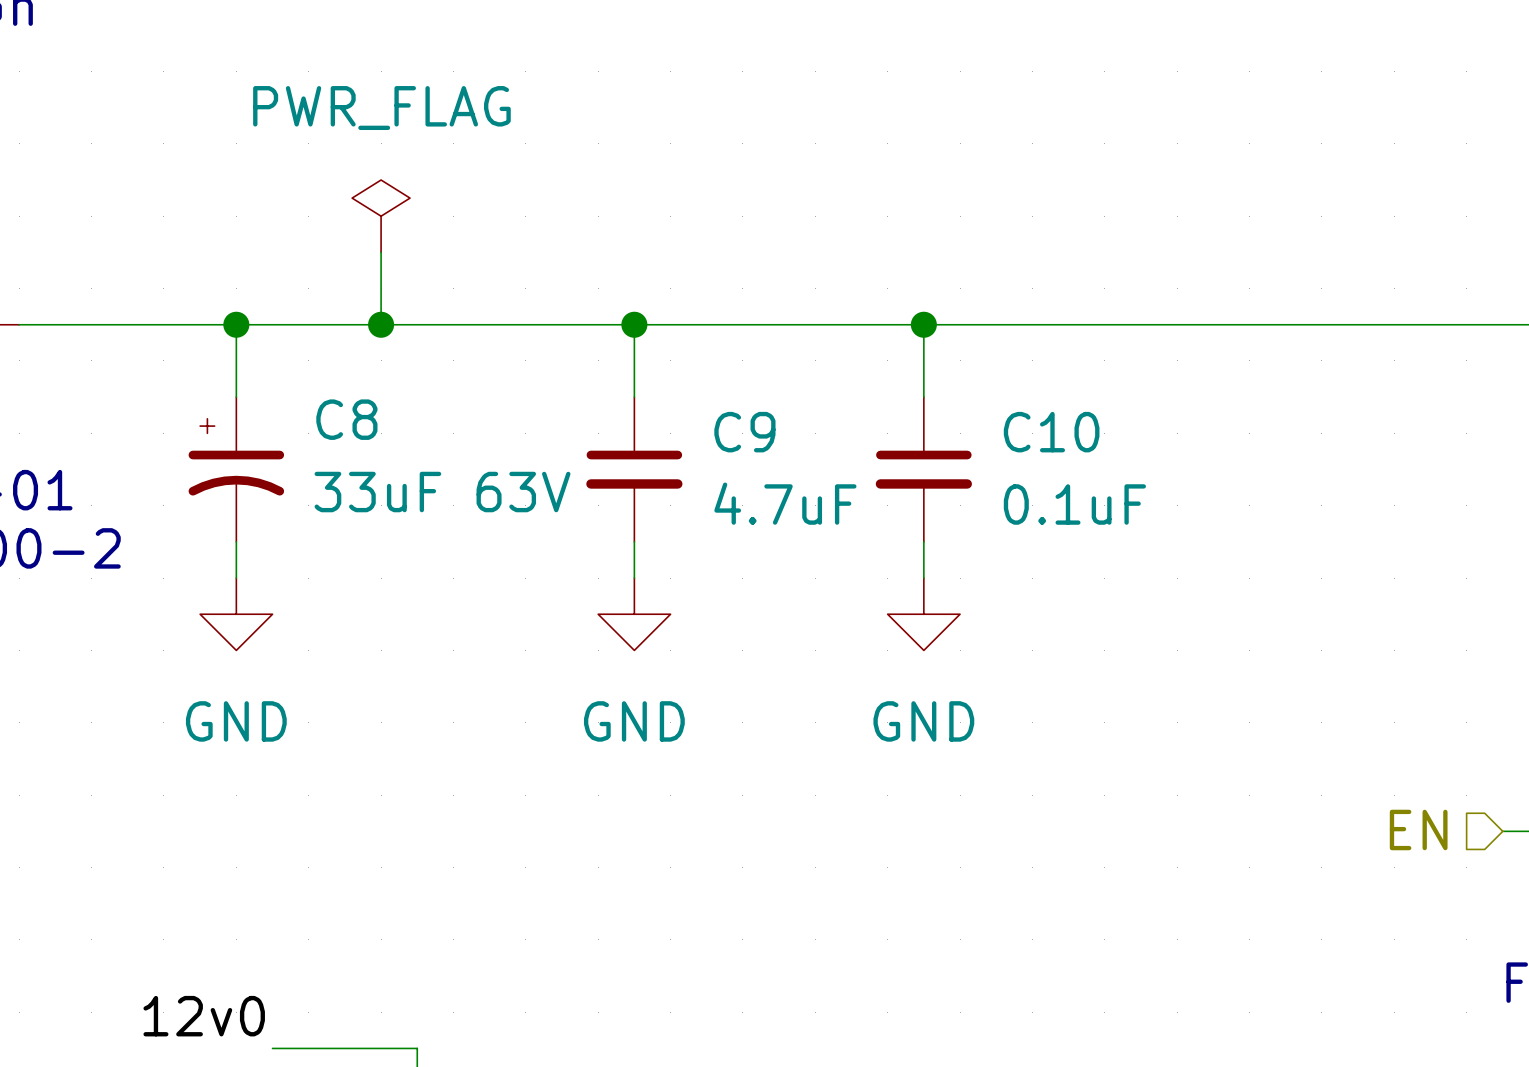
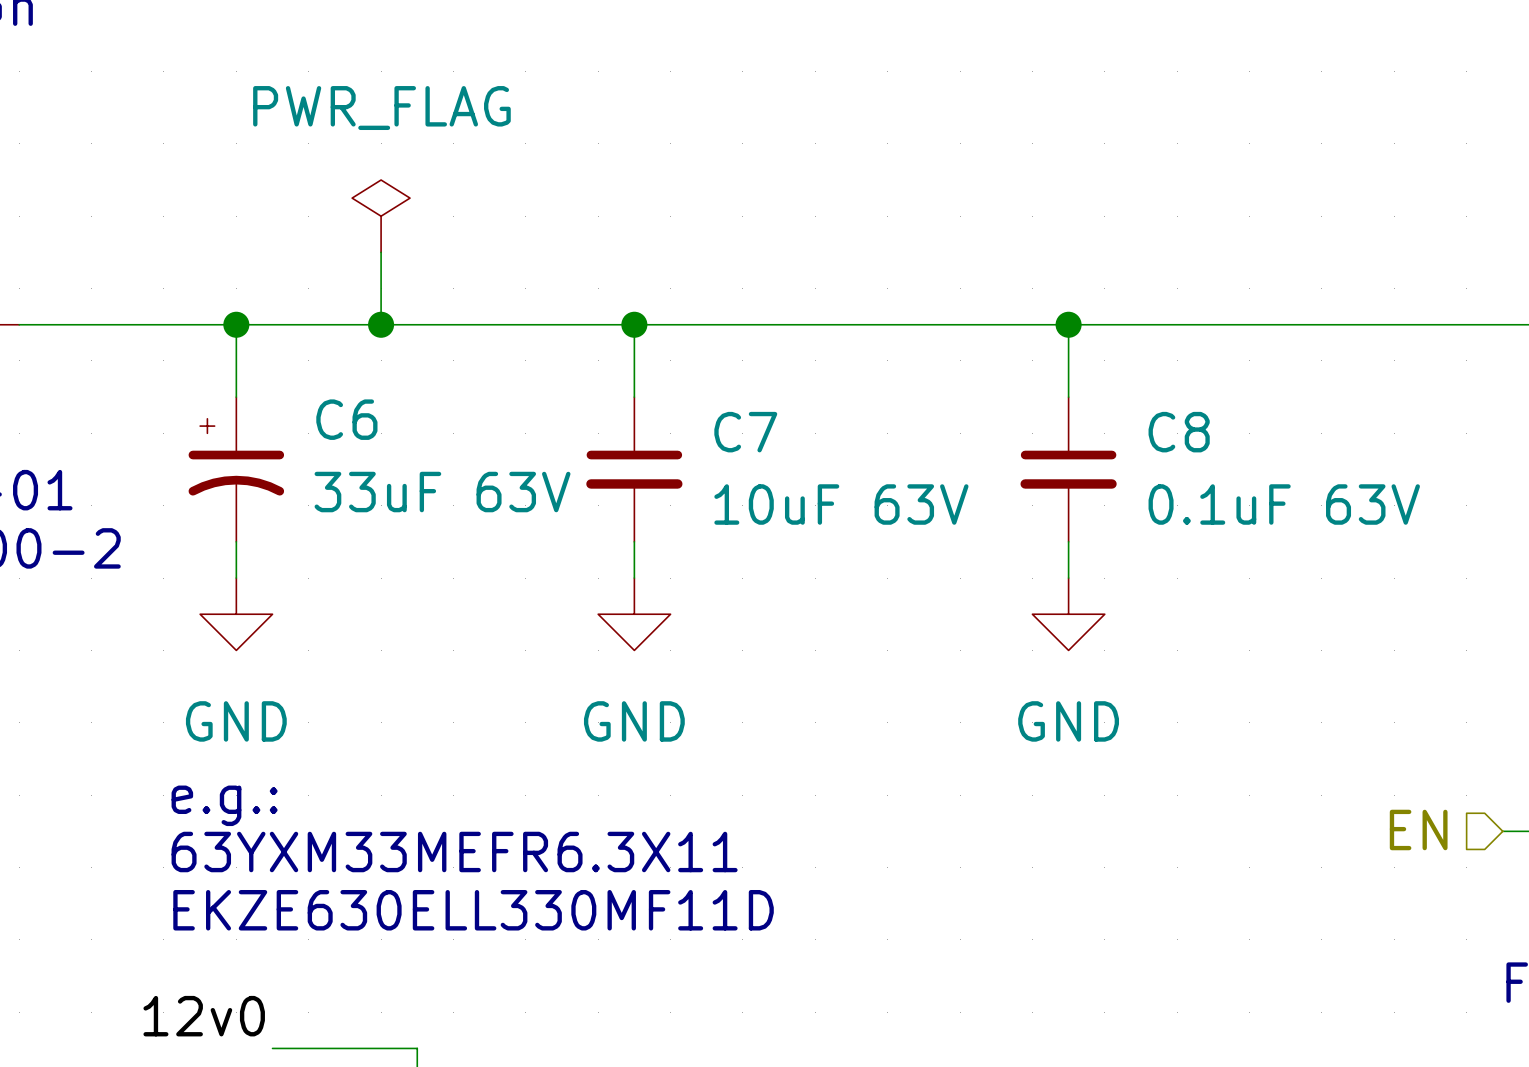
wire: (923, 324) (923, 397) -> (1068, 324) (1068, 397)
junction position: (923, 324) -> (1068, 324)
C8 name: C8 (346, 419) -> C6 (346, 419)
C9 name: C9 (744, 432) -> C7 (745, 432)
C10: 0.1uF (923, 469) -> none
C8: none -> 0.1uF 63V (1068, 469)
C9 value: 4.7uF (785, 503) -> 10uF 63V (841, 504)
wire: (923, 541) (923, 578) -> (1068, 541) (1068, 578)
power symbol position: GND (923, 614) -> GND (1068, 614)
text: none -> e.g.: (224, 805)
text: none -> 63YXM33MEFR6.3X11 (454, 852)
text: none -> EKZE630ELL330MF11D (473, 910)

